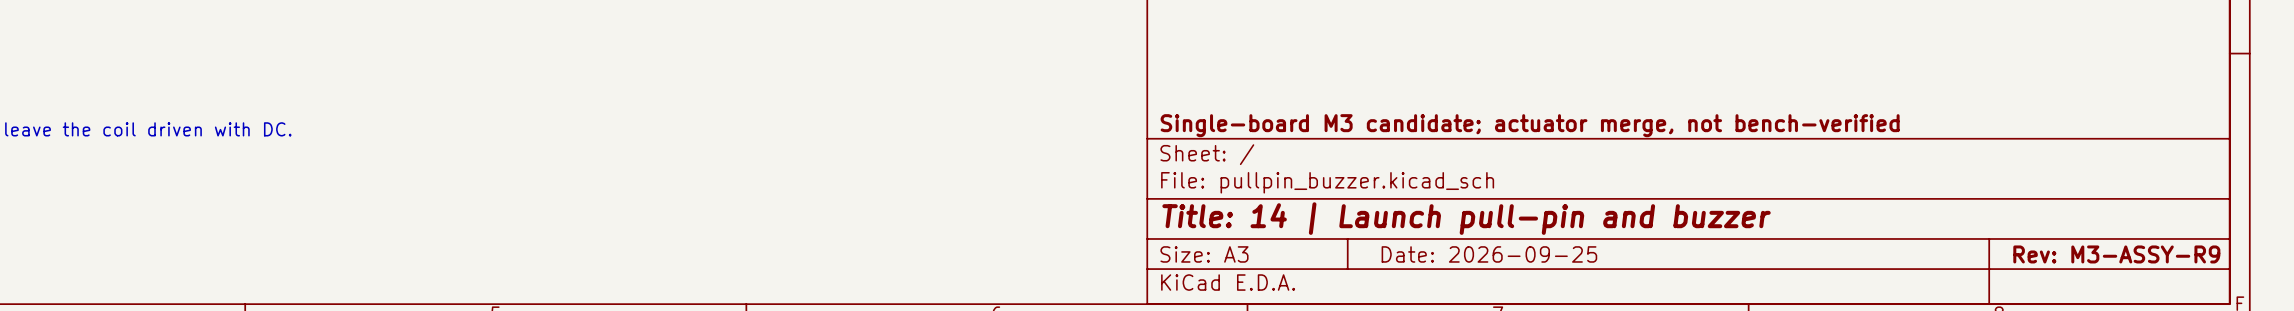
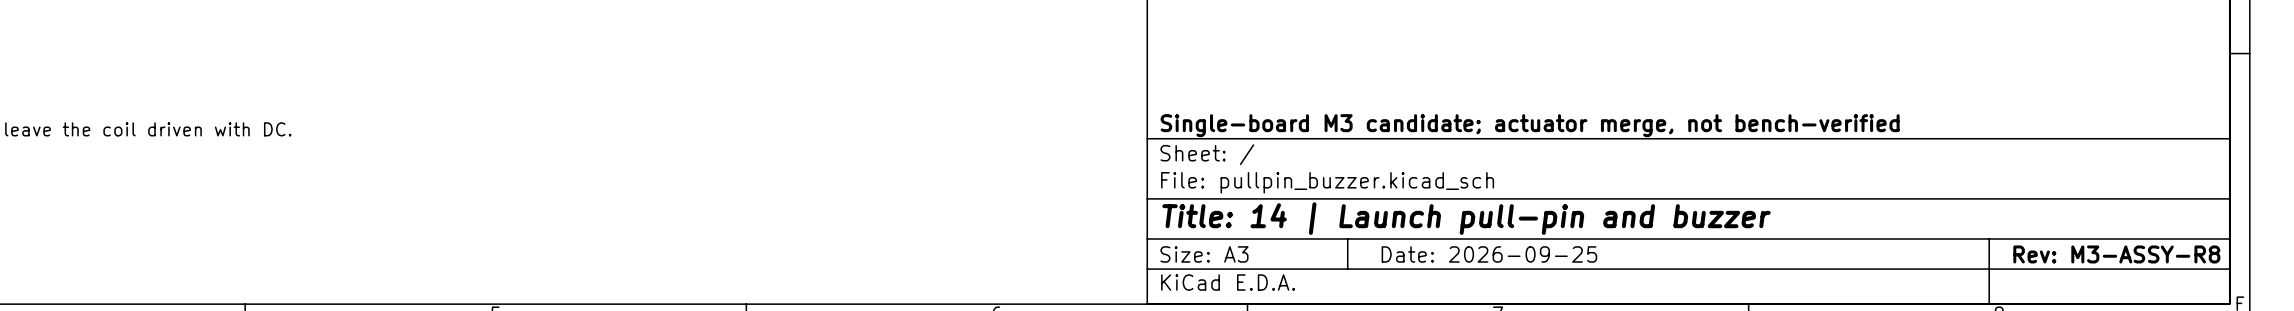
title block: Rev: M3-ASSY-R9 (2116, 254) -> Rev: M3-ASSY-R8 (2116, 254)

